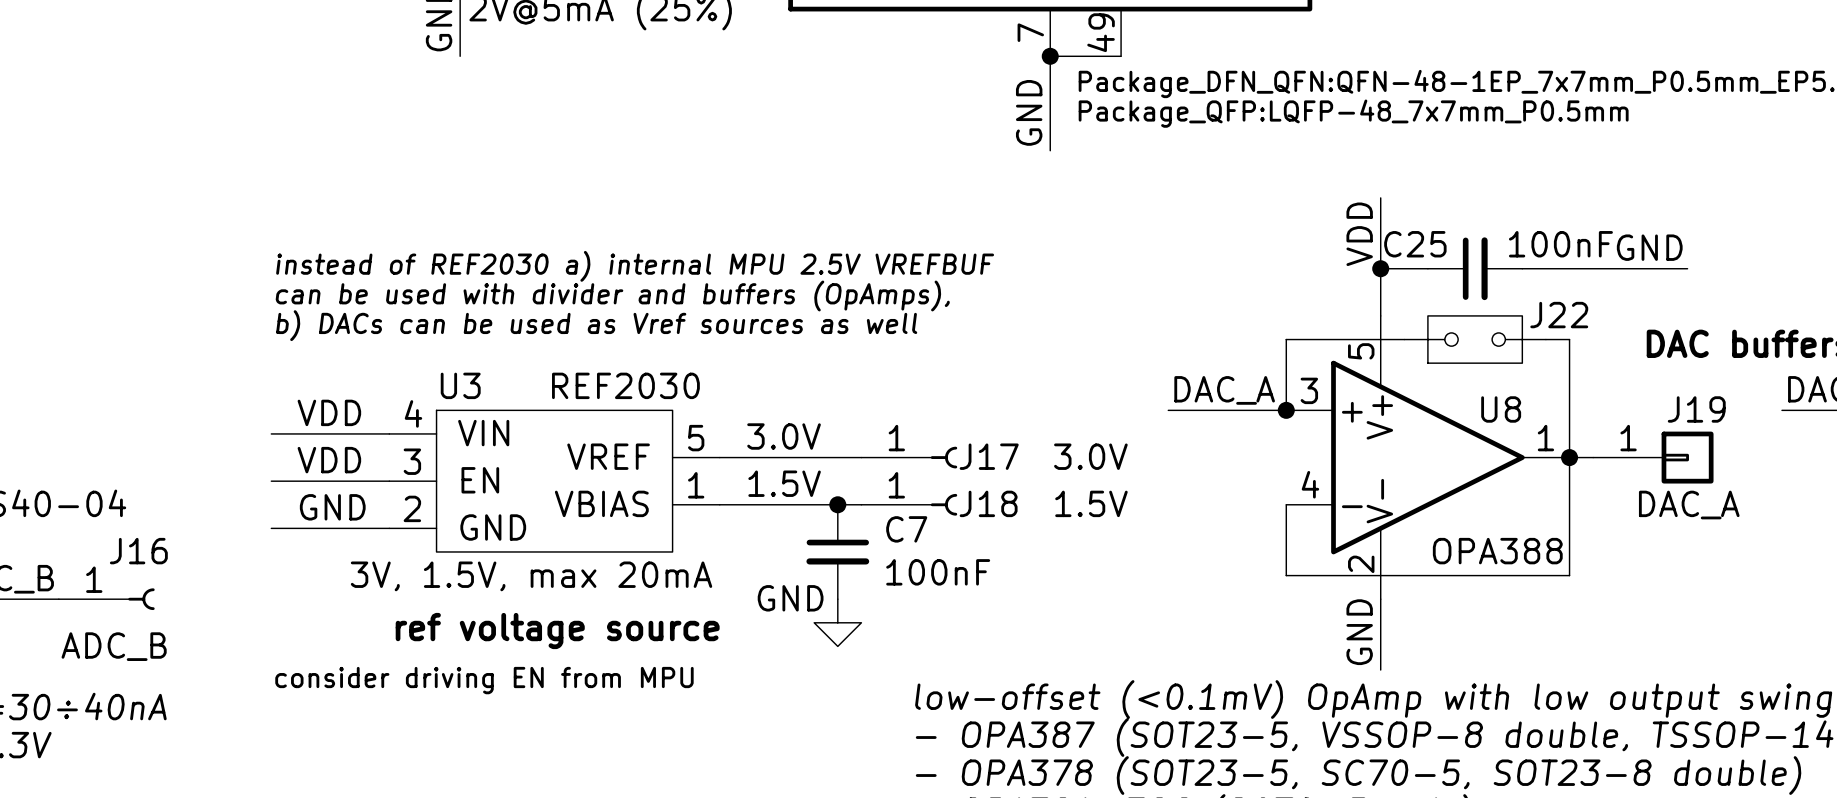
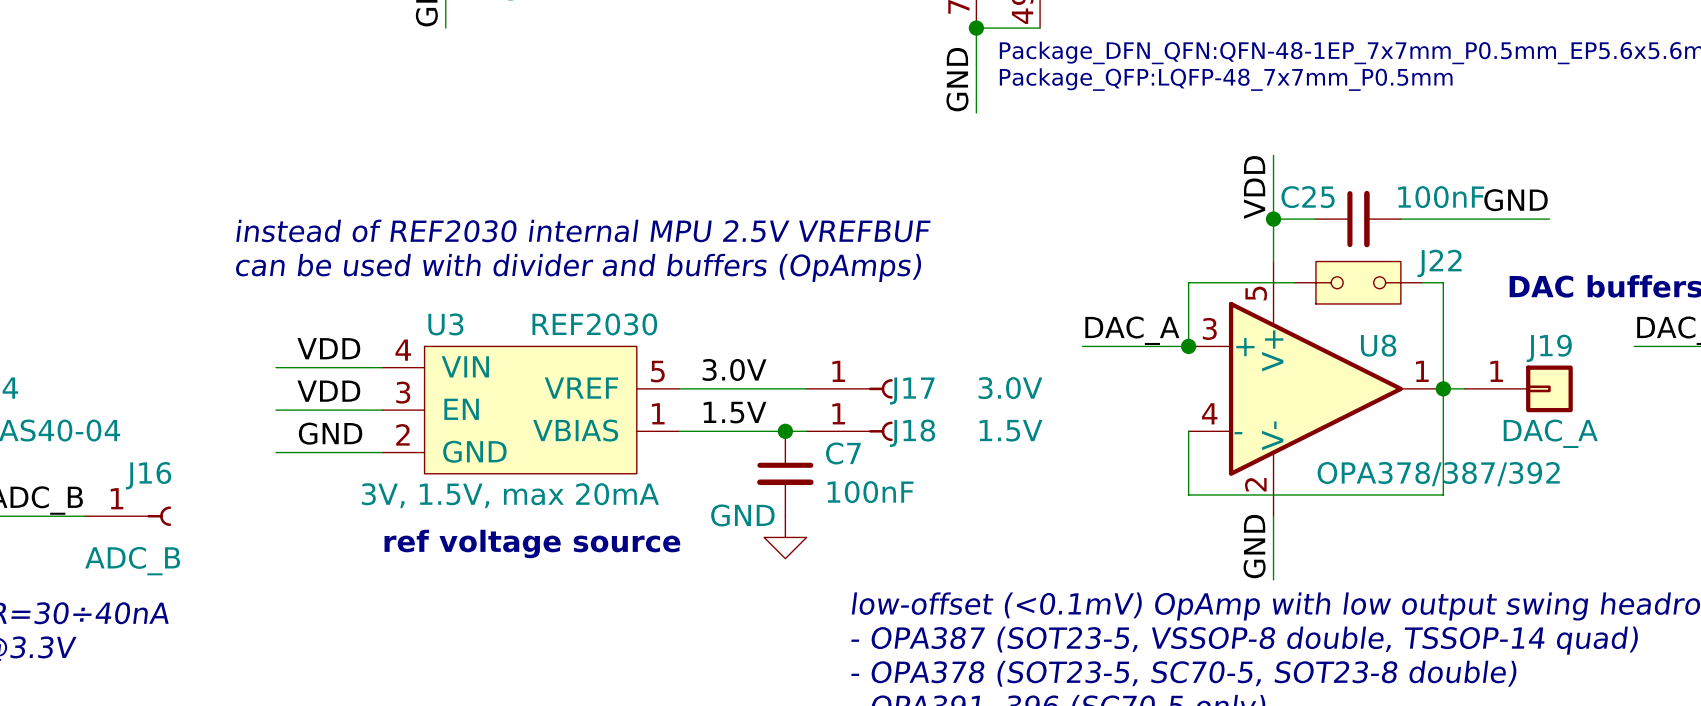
text: instead of REF2030 a) internal MPU 2.5V VREFBUF (635, 266) -> instead of REF2030 internal MPU 2.5V VREFBUF (583, 230)
text: can be used with divider and buffers (OpAmps), (612, 295) -> can be used with divider and buffers (OpAmps) (578, 267)
text: b) DACs can be used as Vref sources as well (596, 325) -> none
U8 value: OPA388 (1497, 551) -> OPA378/387/392 (1438, 474)
text: consider driving EN from MPU (484, 680) -> none

